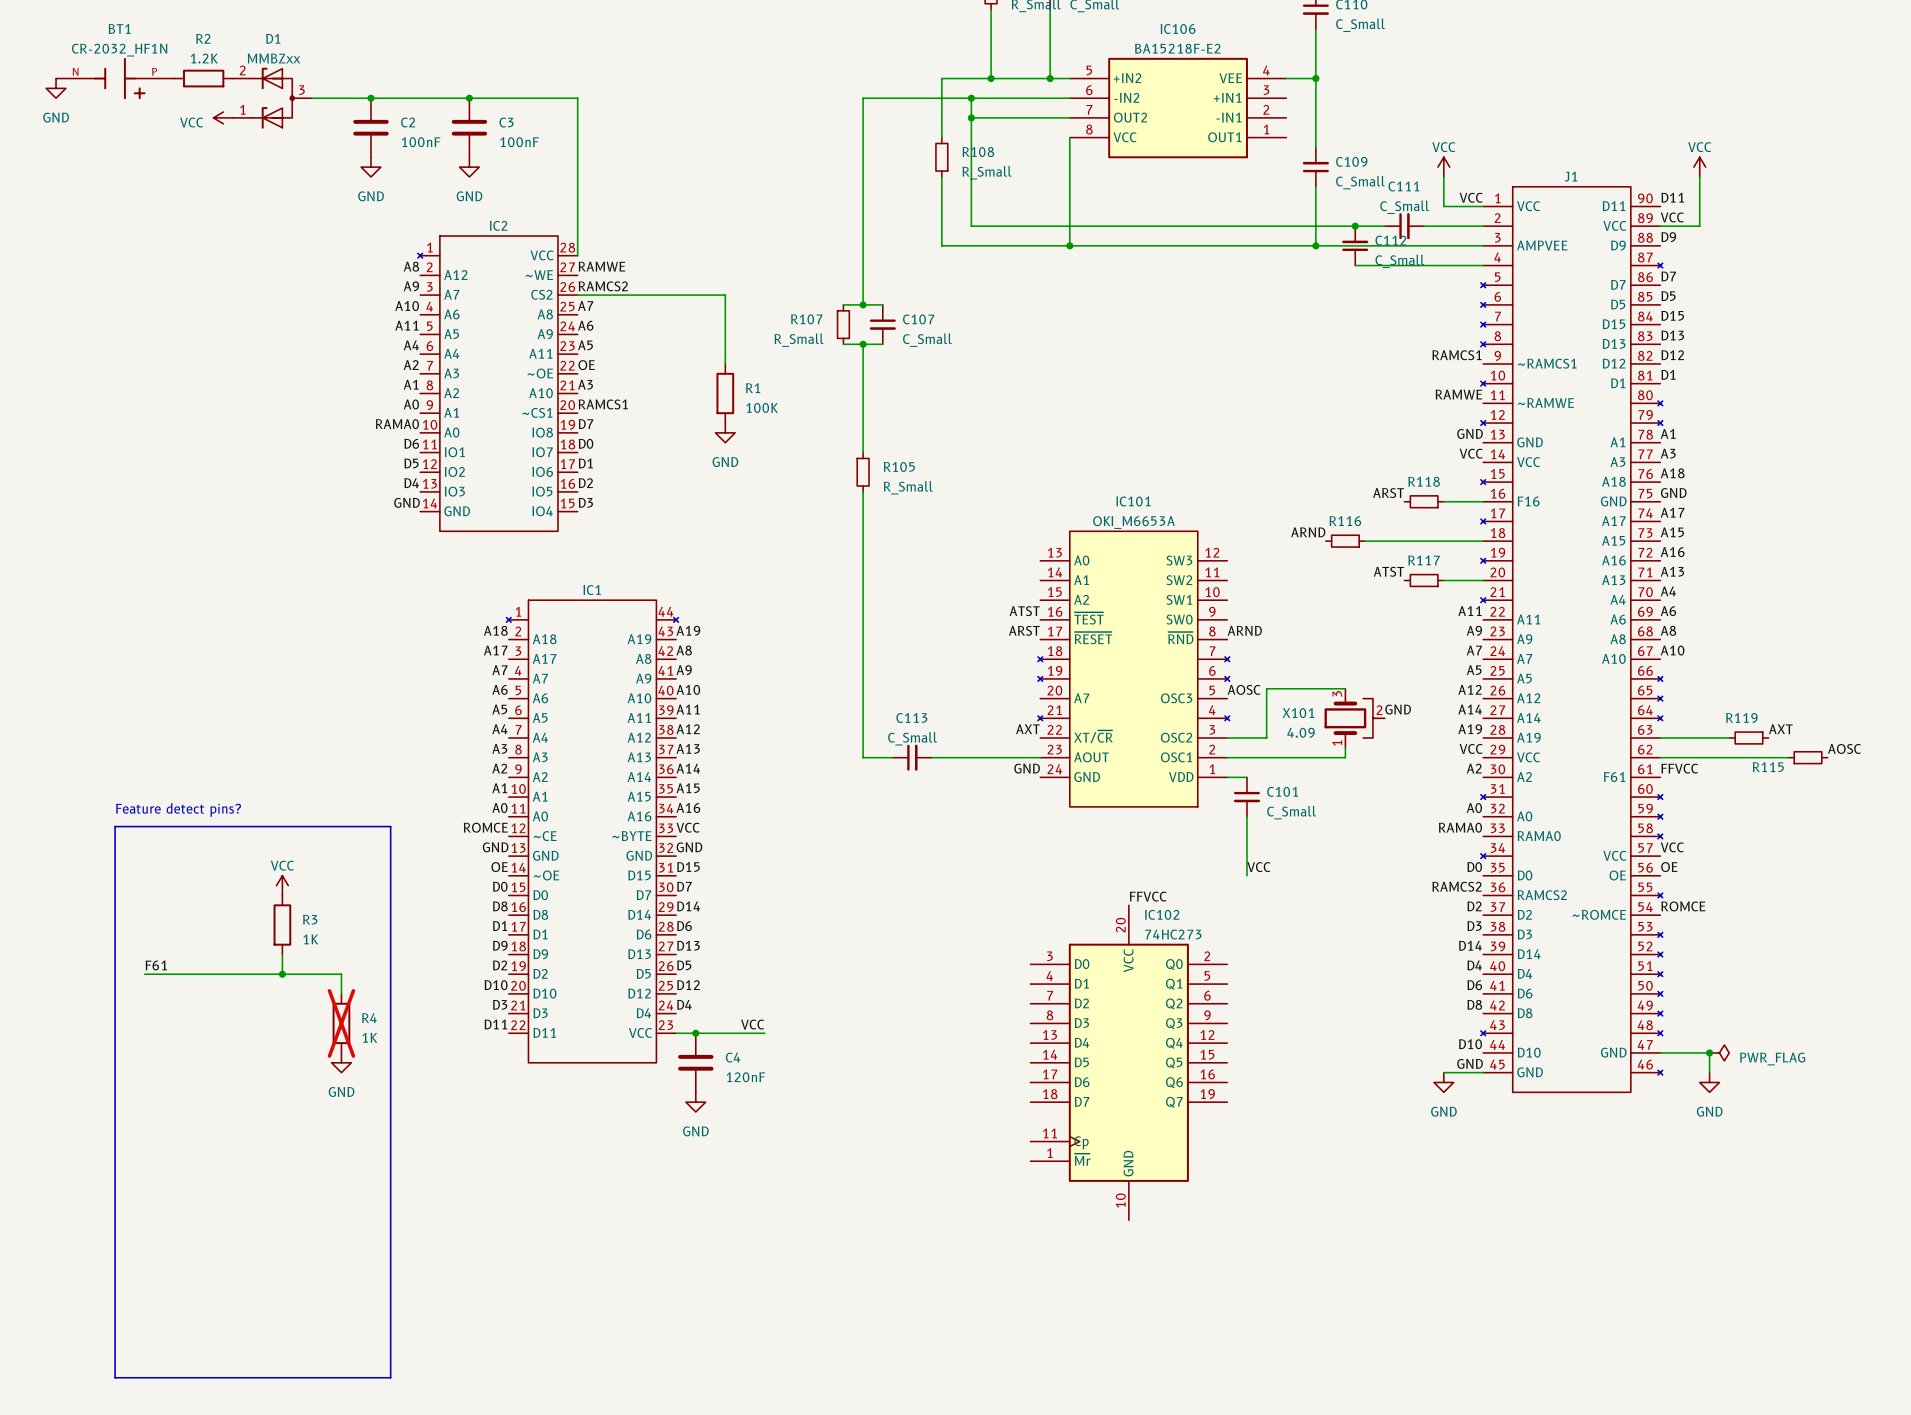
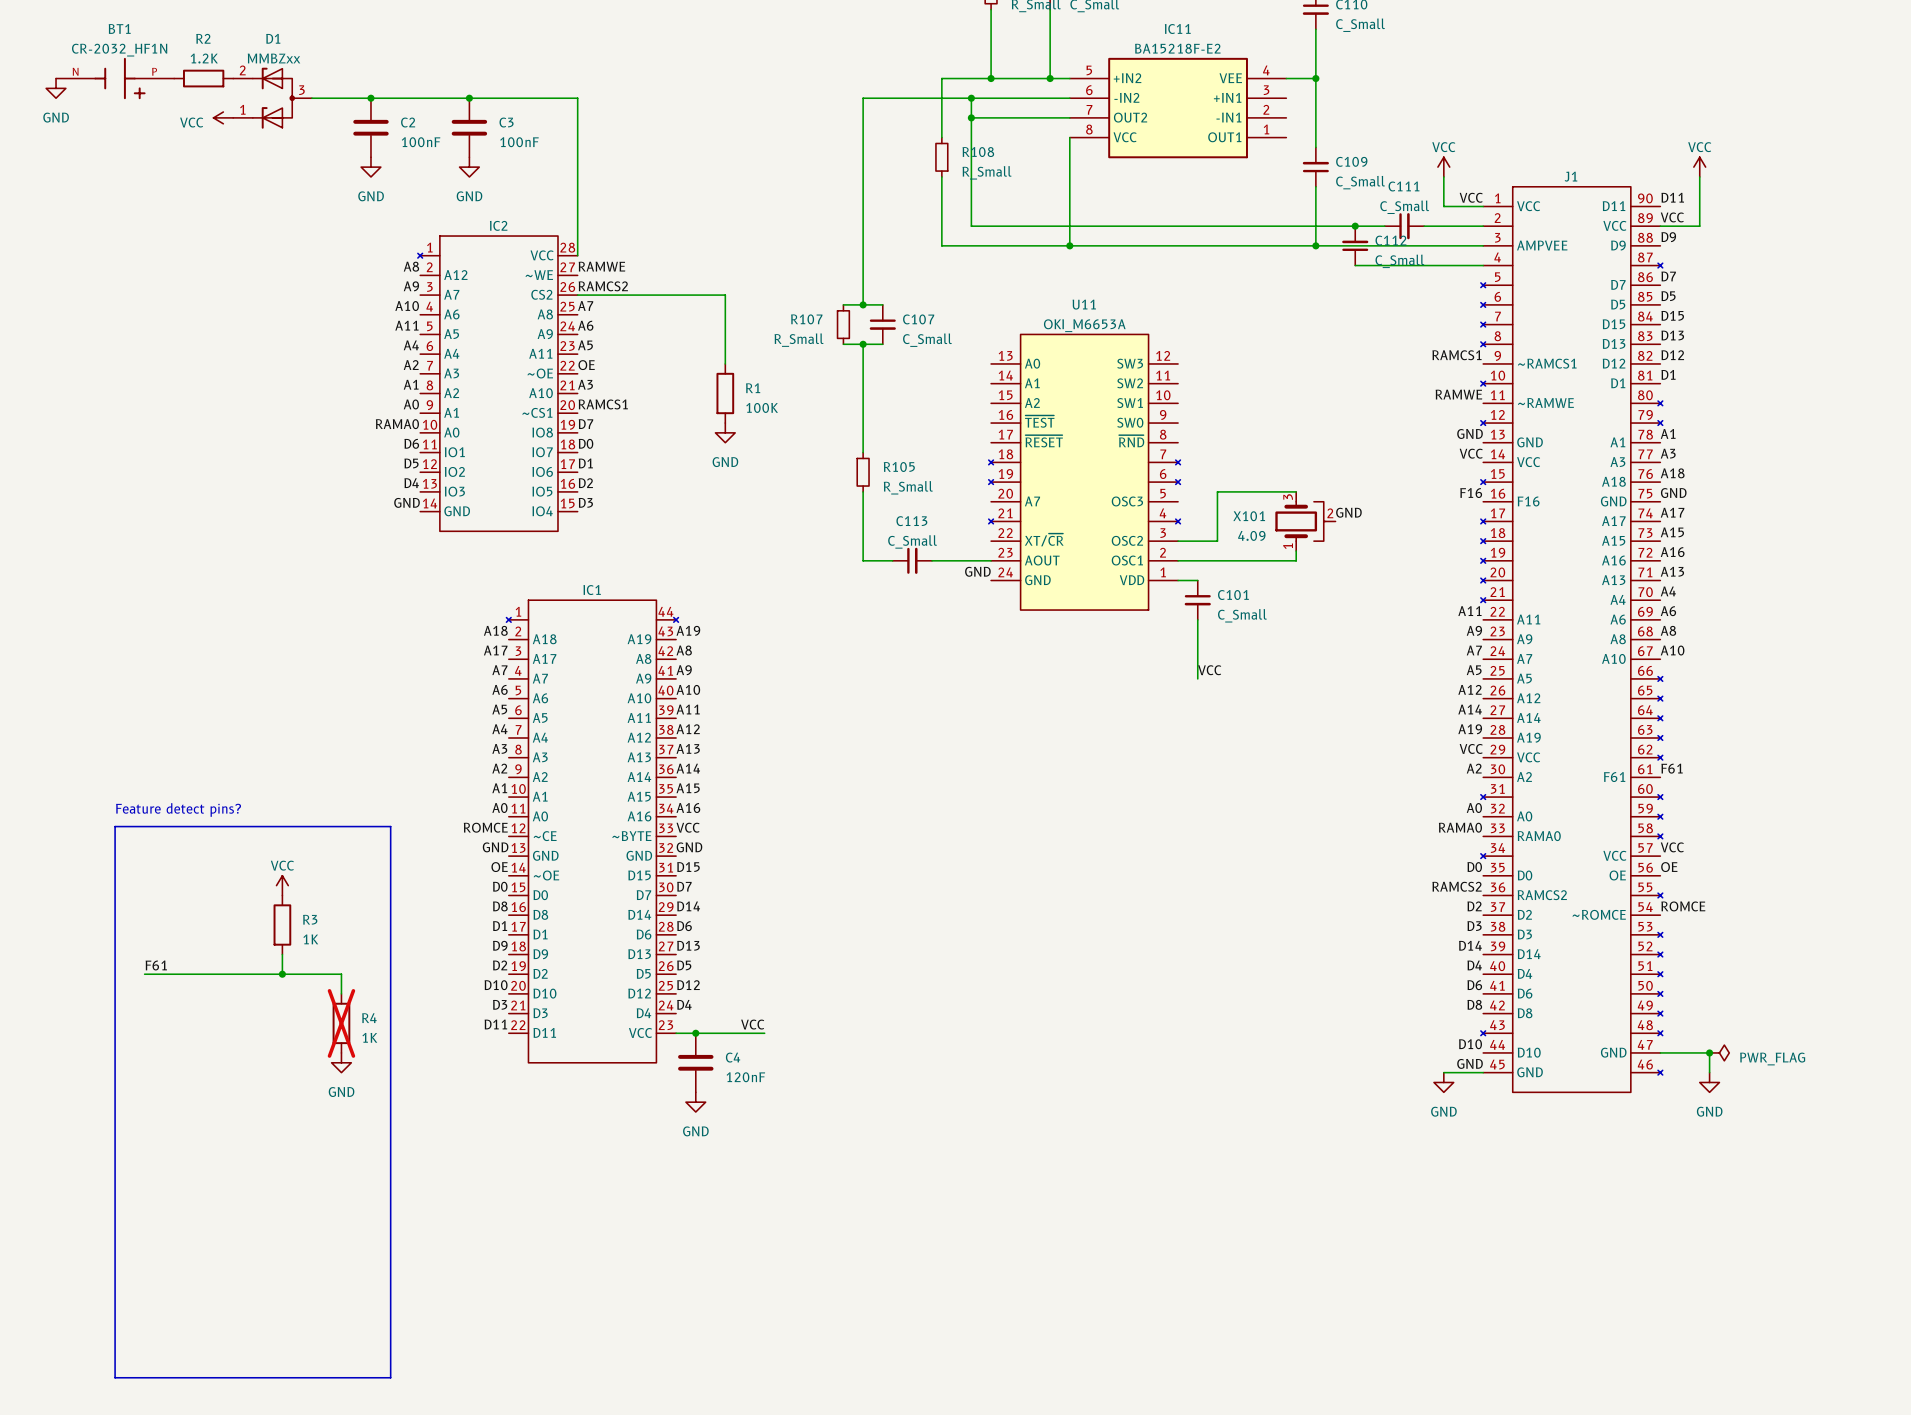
IC106 name: IC106 (1178, 29) -> IC11 (1177, 29)
J1 symbol: [1480, 186, 1663, 1093] -> [1480, 186, 1663, 1093]
U11: none -> OKI_M6653A (1084, 472)
wire: none -> (1296, 491) (1217, 491) (1217, 541) (1178, 541)
label: ARST (1388, 493) -> none
label: none -> F16 (1471, 493)
R118: (1424, 501) -> none
wire: (1443, 501) (1483, 501) -> none
label: none -> GND (1348, 512)
label: ARND (1308, 532) -> none
R116: (1345, 541) -> none
wire: (1365, 541) (1483, 541) -> none
wire: none -> (1296, 550) (1296, 560) (1178, 560)
wire: (863, 560) (863, 757) (892, 757) -> (863, 560) (892, 560)
wire: none -> (932, 560) (991, 560)
label: none -> GND (977, 571)
label: ATST (1388, 571) -> none
R117: (1424, 580) -> none
wire: (1443, 580) (1483, 580) -> none
label: ATST (1024, 611) -> none
label: ARST (1024, 630) -> none
label: ARND (1244, 630) -> none
IC101: OKI_M6653A (1133, 669) -> none
label: none -> VCC (1209, 670)
wire: (1345, 688) (1266, 688) (1266, 737) (1227, 737) -> none
label: AOSC (1244, 689) -> none
label: GND (1398, 709) -> none
X101 position: (1354, 718) -> (1305, 521)
label: AXT (1027, 729) -> none
label: AXT (1780, 729) -> none
wire: (1660, 737) (1729, 737) -> none
R119: (1748, 737) -> none
wire: (1345, 747) (1345, 757) (1227, 757) -> none
label: AOSC (1844, 748) -> none
C113 position: (912, 757) -> (912, 560)
wire: (932, 757) (1040, 757) -> none
wire: (1660, 757) (1788, 757) -> none
R115: (1808, 757) -> none
label: GND (1027, 768) -> none
label: FFVCC (1679, 768) -> F61 (1672, 768)
wire: (1227, 777) (1246, 777) -> none
C101 position: (1246, 797) -> (1197, 600)
wire: (1246, 816) (1246, 875) -> none
label: VCC (1258, 867) -> none
label: FFVCC (1148, 896) -> none
IC102: 74HC273 (1128, 1062) -> none

